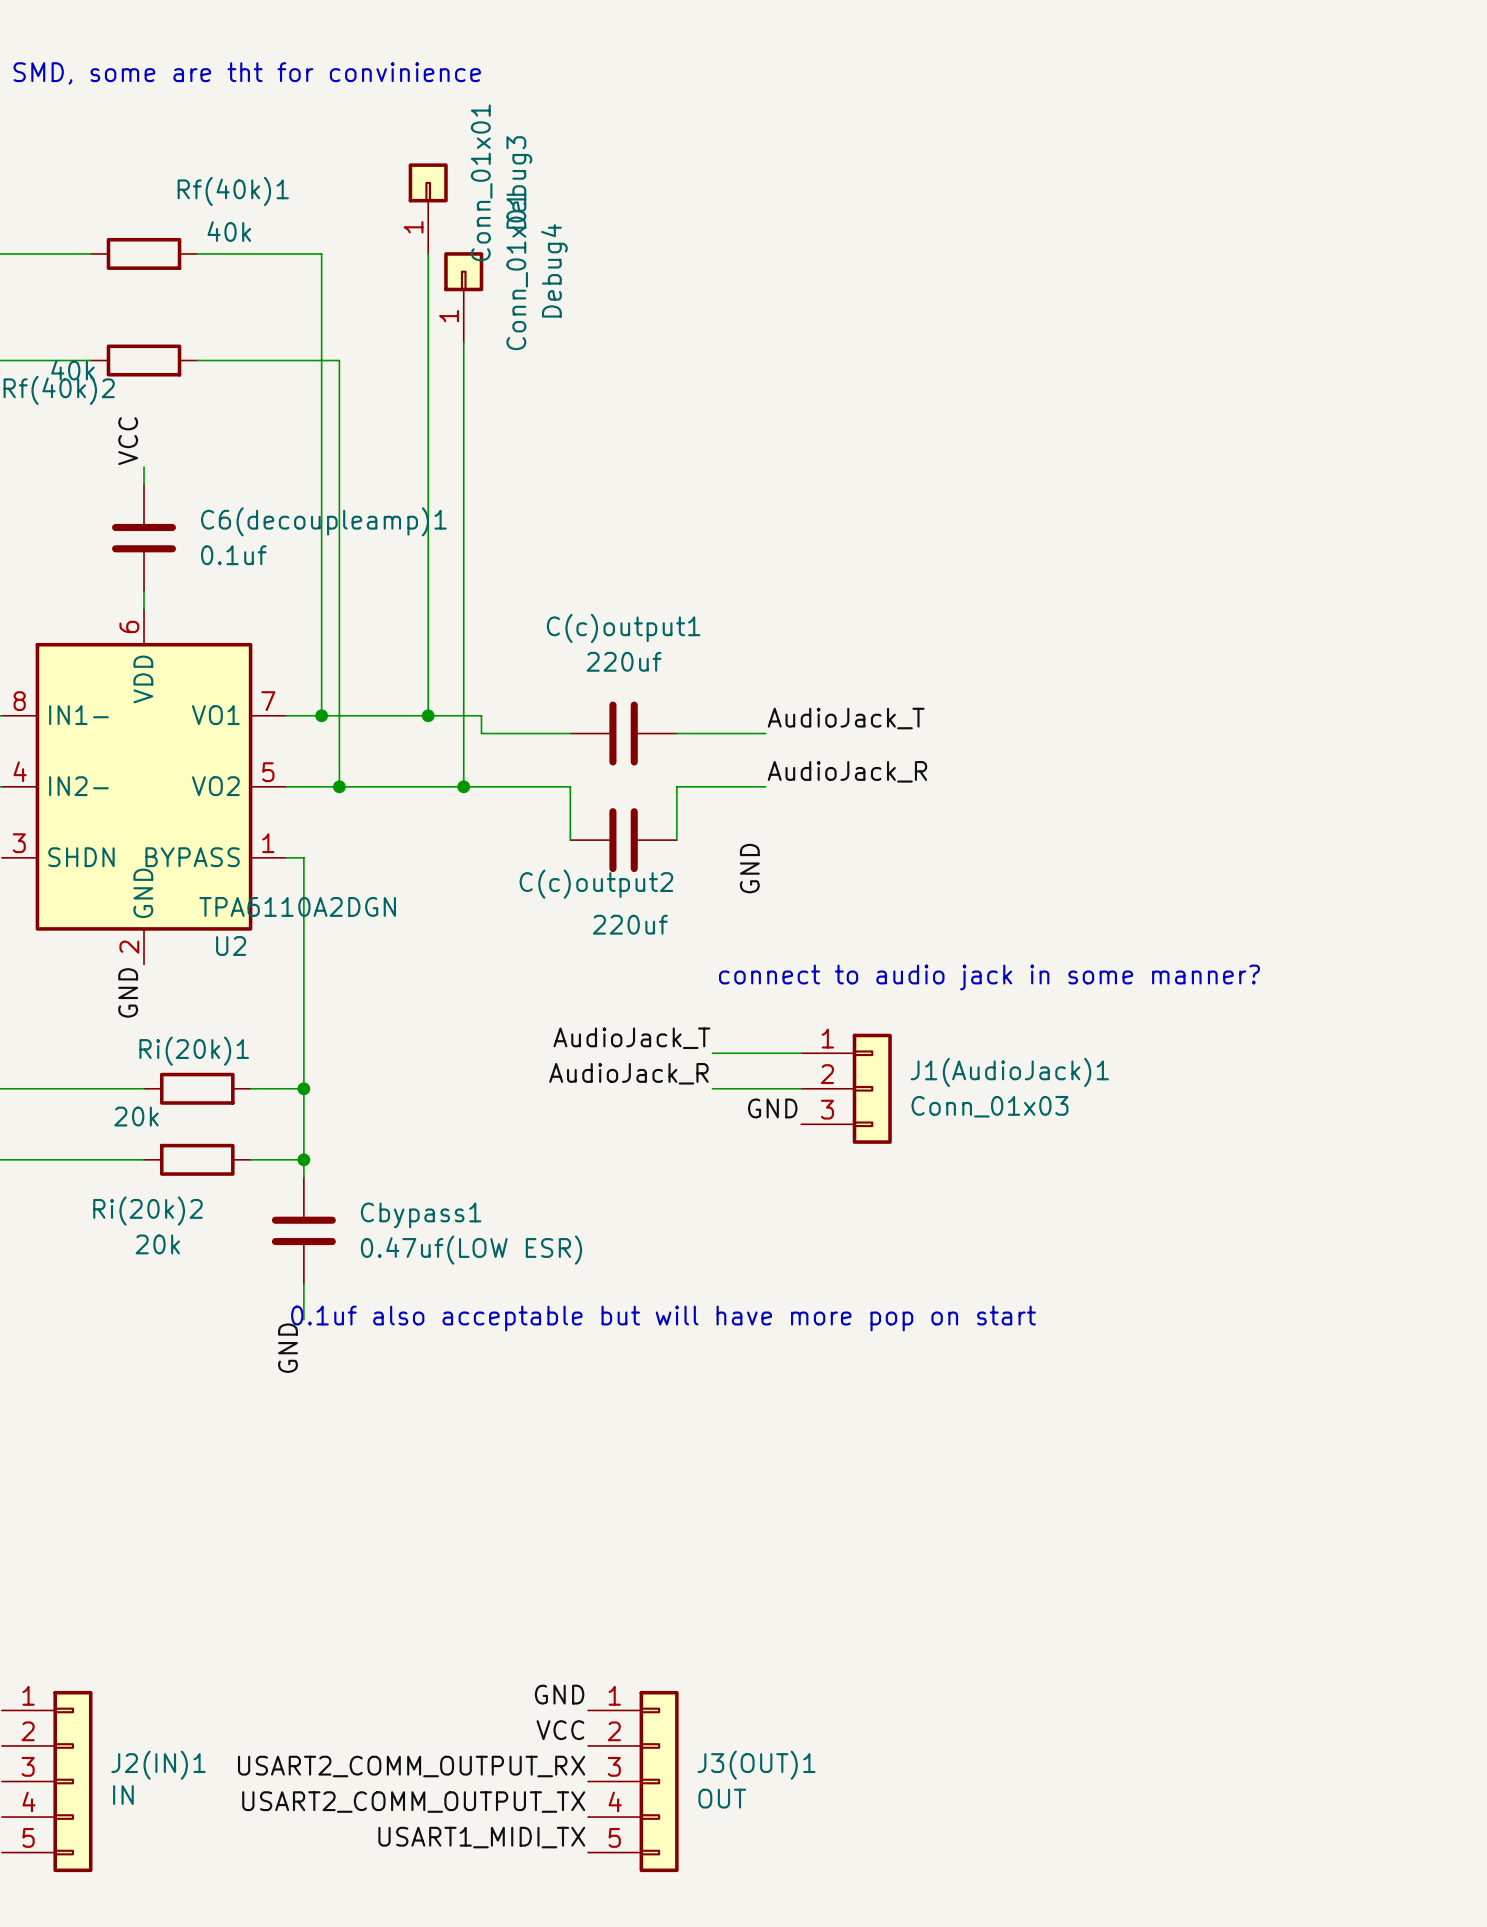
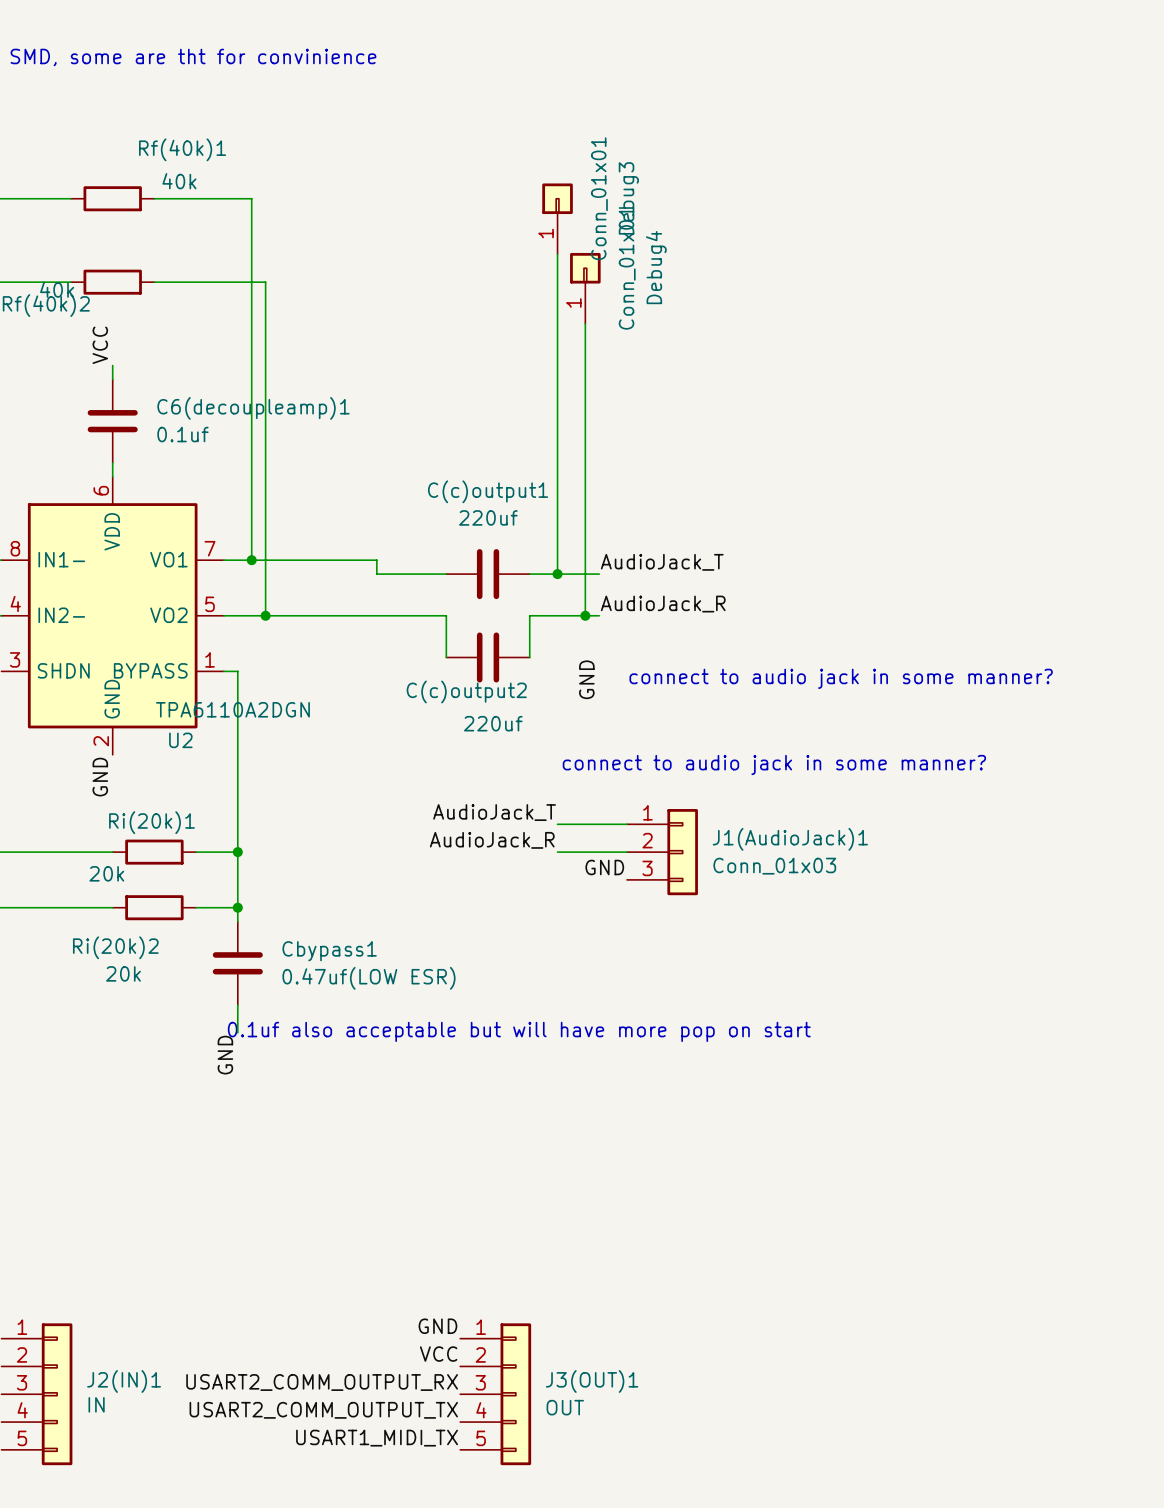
Debug3 position: (428, 208) -> (557, 218)
wire: (428, 253) (428, 715) -> none
Debug4 position: (463, 297) -> (585, 288)
wire: none -> (557, 254) (557, 574)
wire: (463, 342) (463, 786) -> none
wire: none -> (585, 323) (585, 615)
junction: (428, 715) -> none
junction: none -> (557, 574)
junction: (463, 786) -> none
junction: none -> (585, 615)
text: none -> connect to audio jack in some manner? (841, 678)

